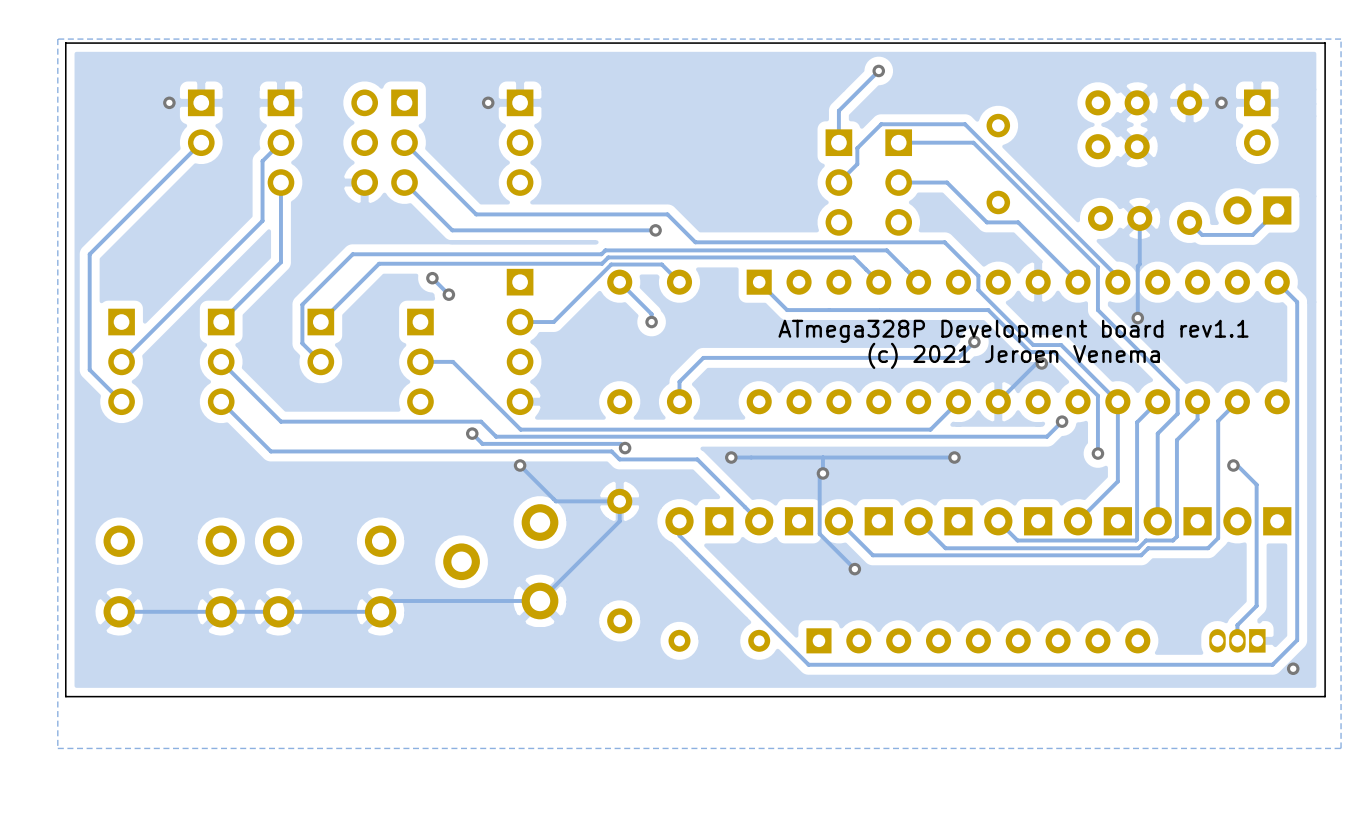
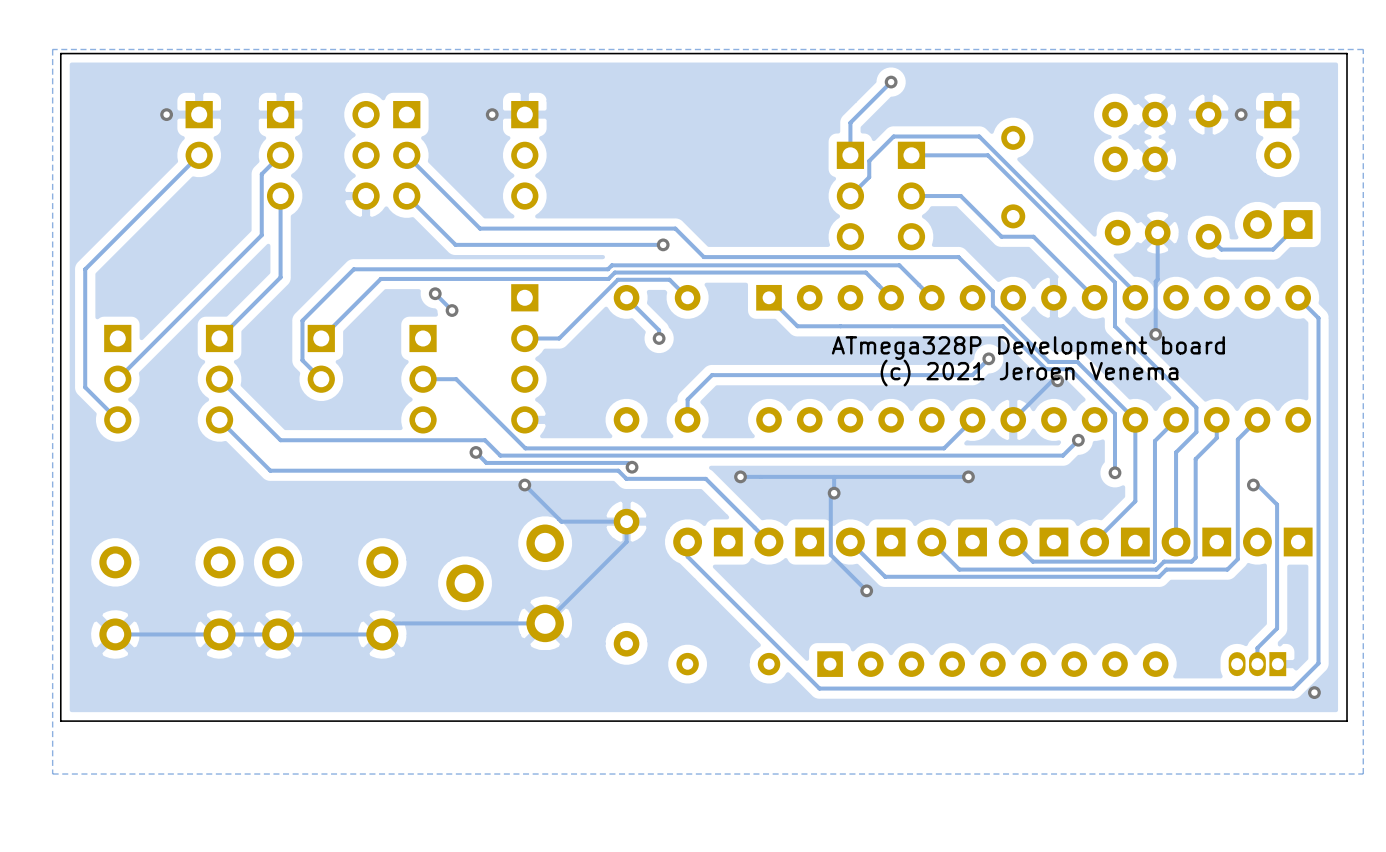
text: ATmega328P Development board rev1.1 (1013, 331) -> ATmega328P Development board (1028, 348)

